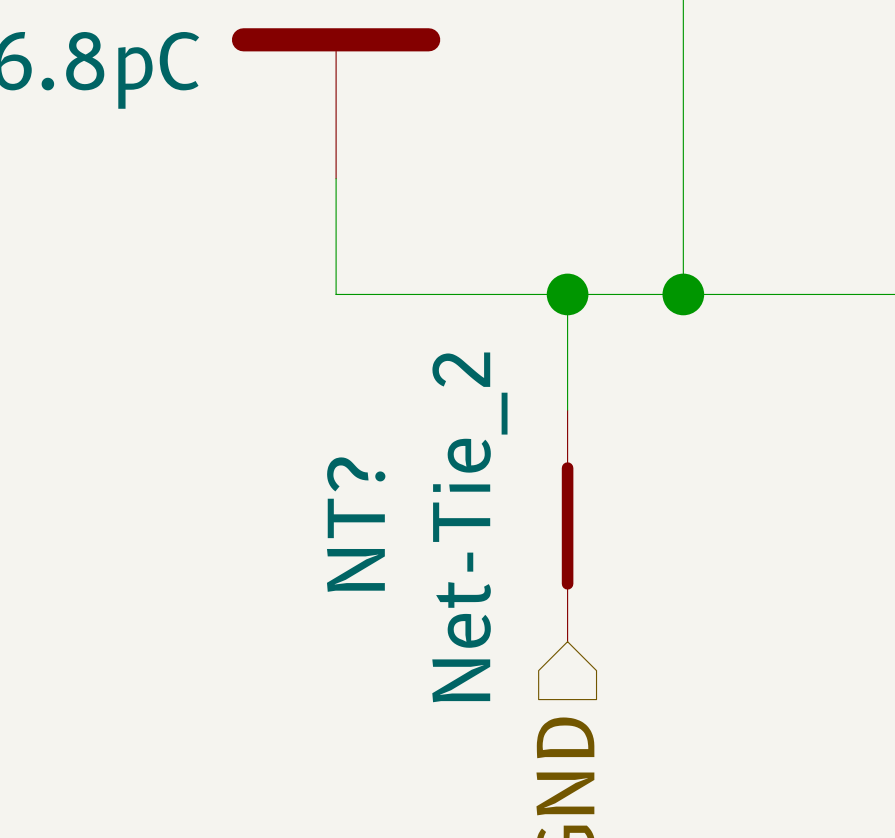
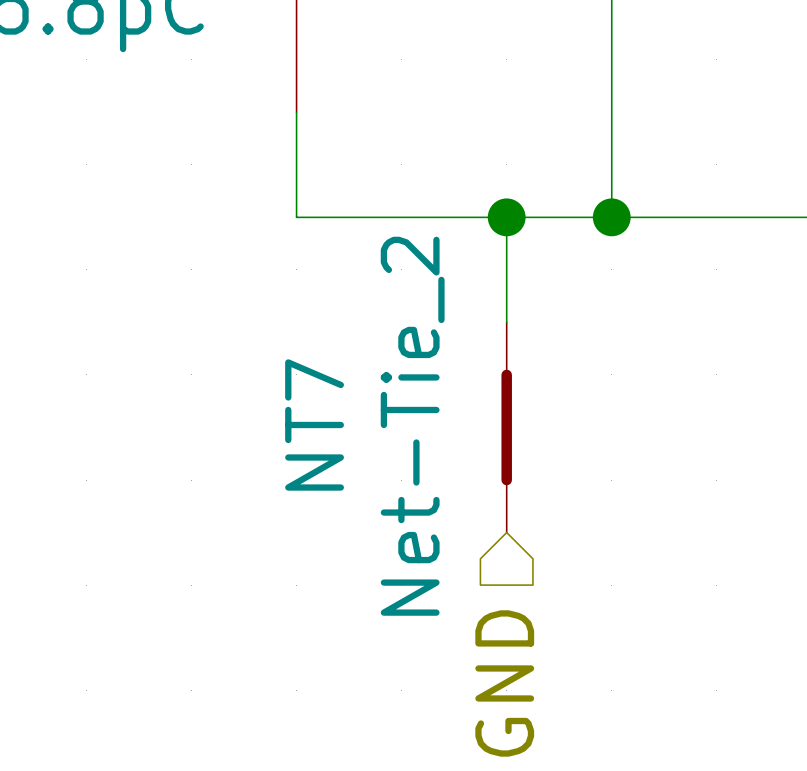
NT? name: NT? (356, 524) -> NT7 (314, 424)

